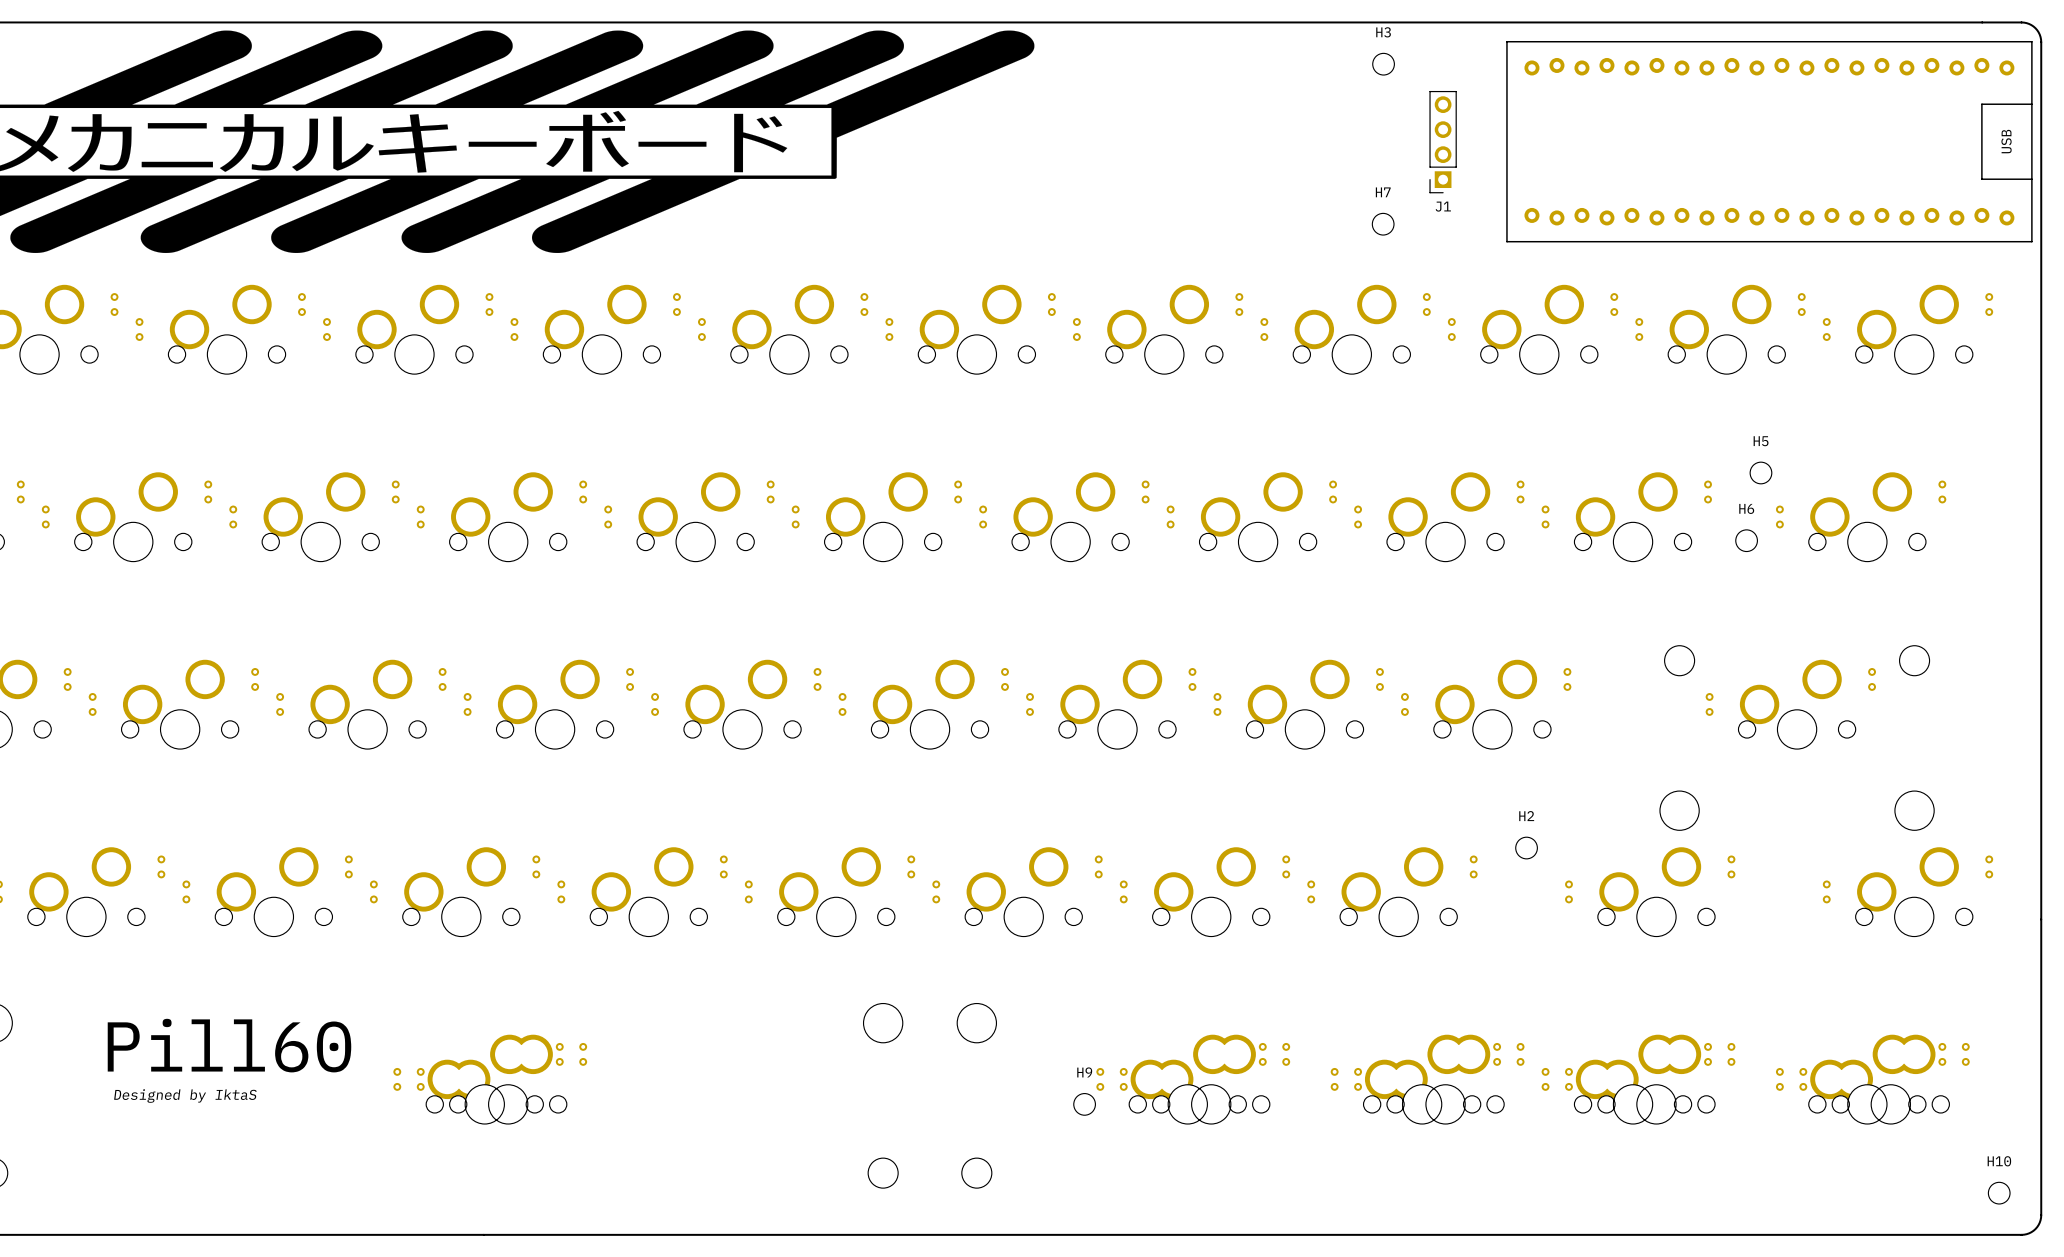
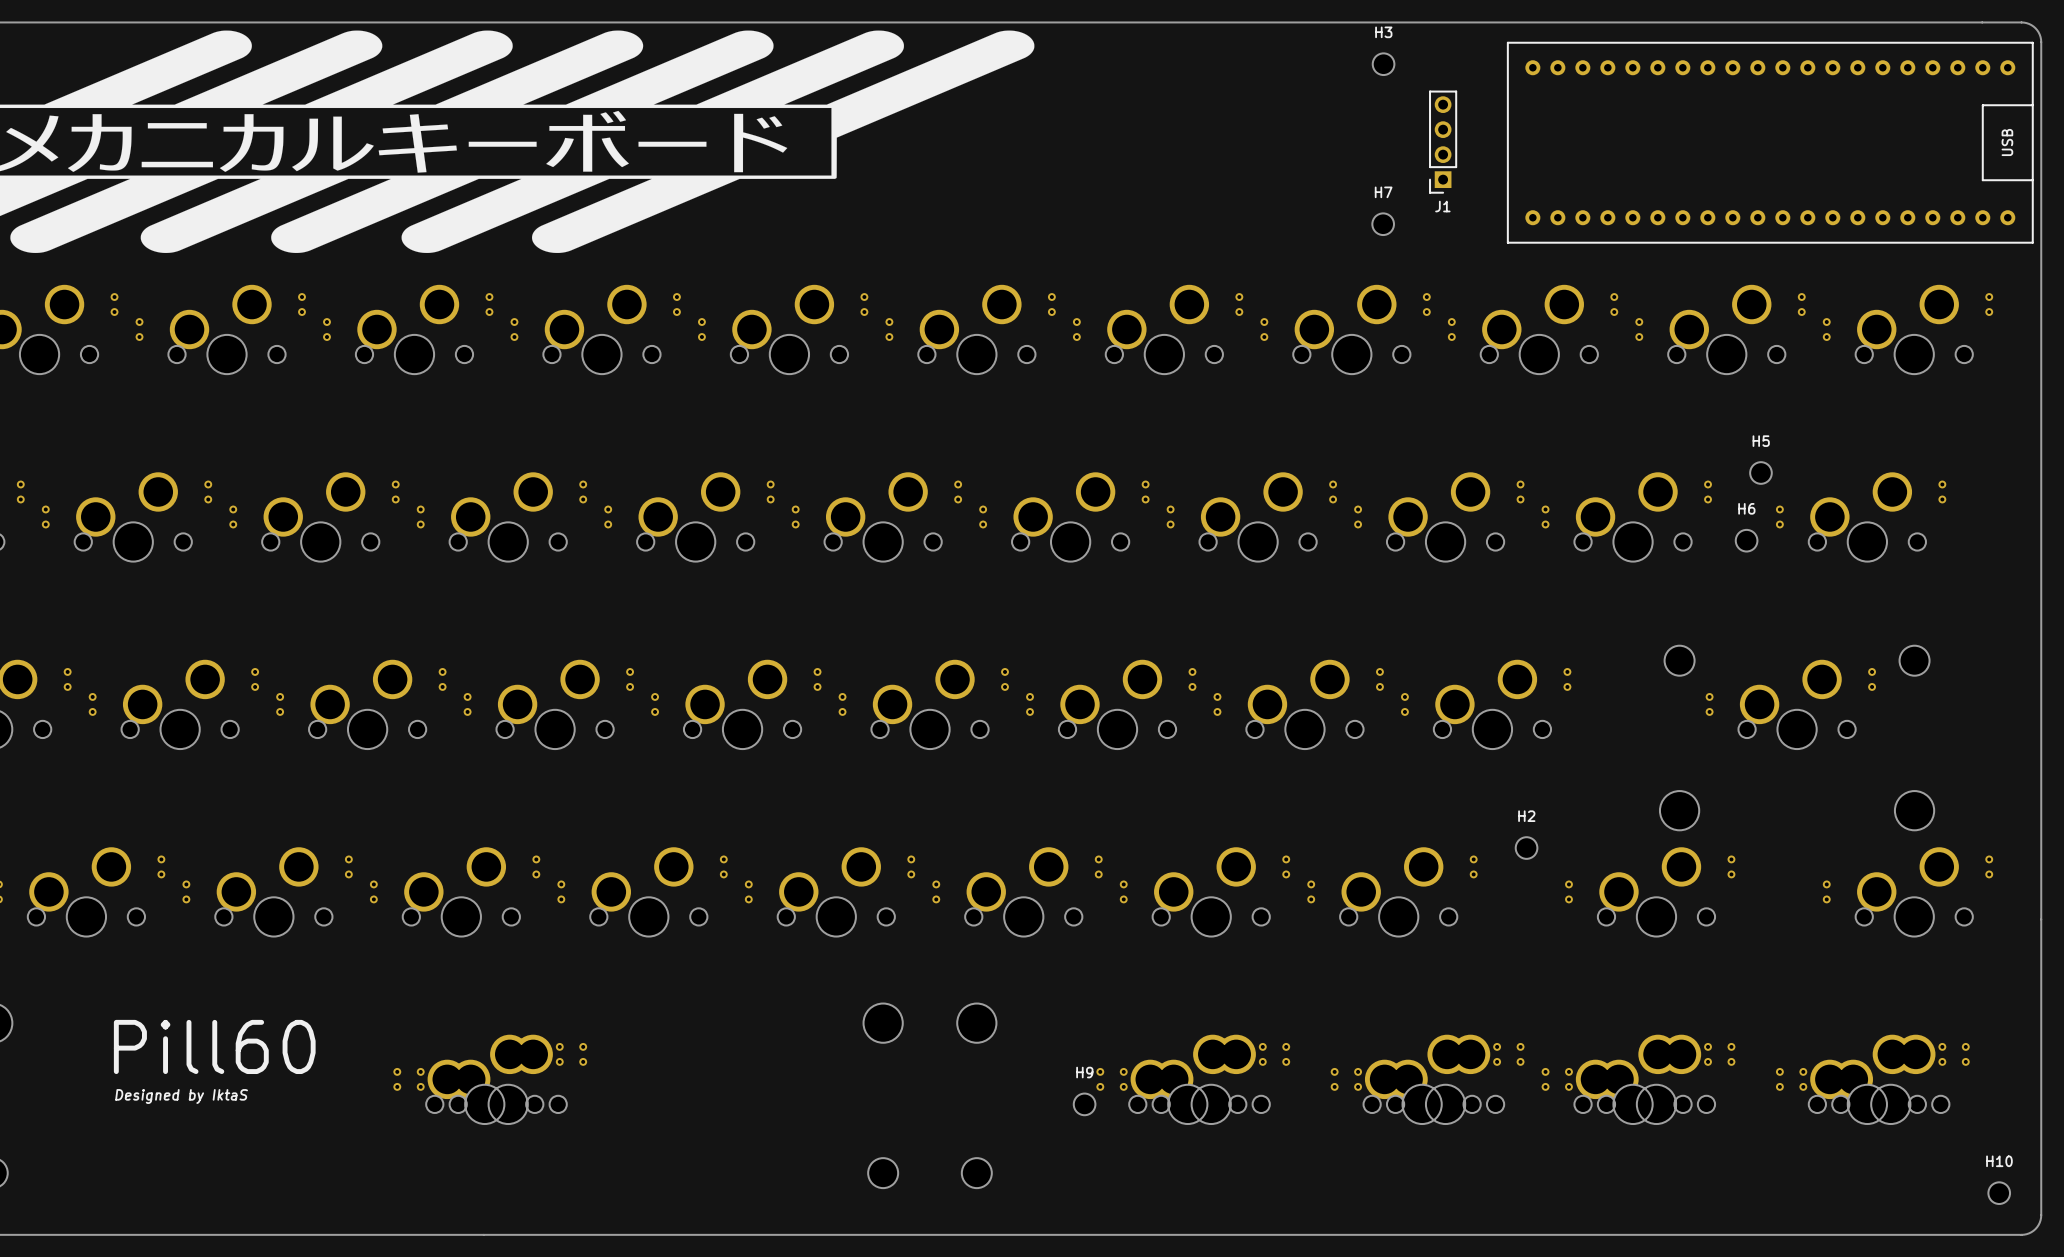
part footprint: [1506, 40, 2033, 243] -> [1507, 42, 2034, 244]

